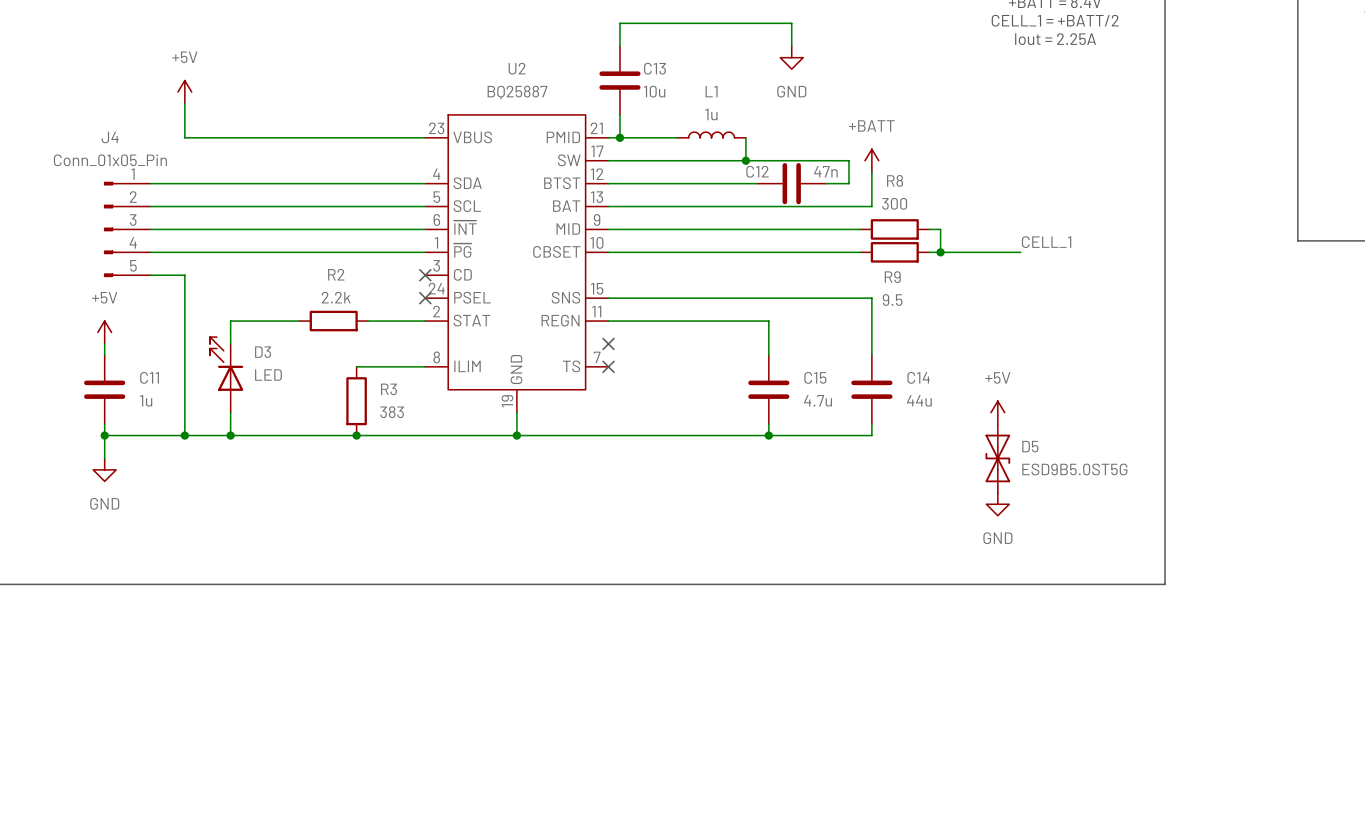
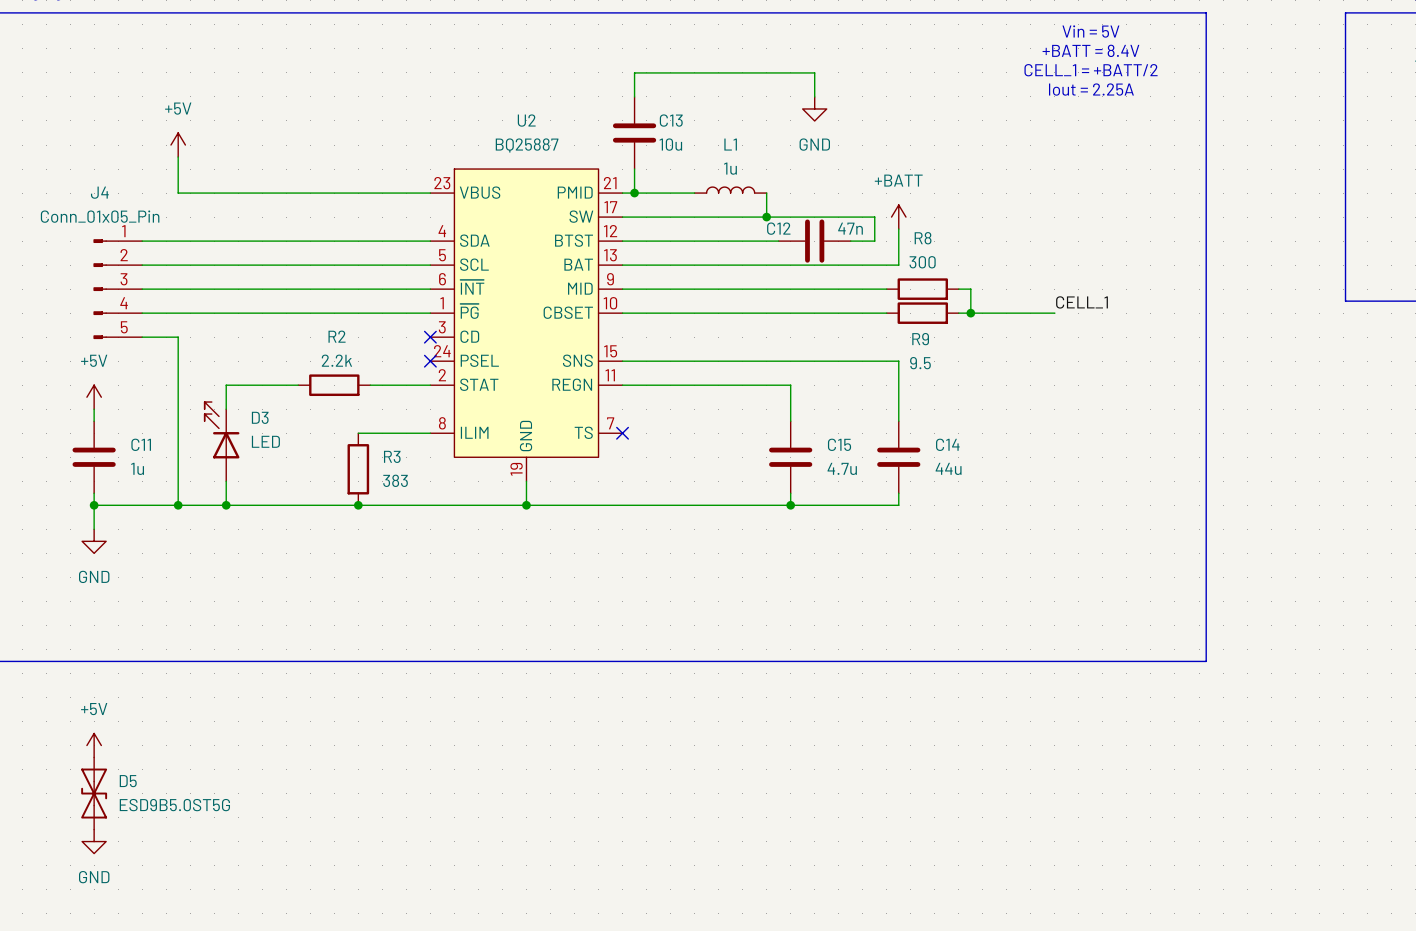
no-connect mark: (608, 343) -> none
power symbol: +5V (997, 412) -> none
D5 position: (997, 458) -> (94, 793)
power symbol: GND (997, 504) -> none
power symbol: none -> +5V (94, 745)
power symbol: none -> GND (94, 841)

